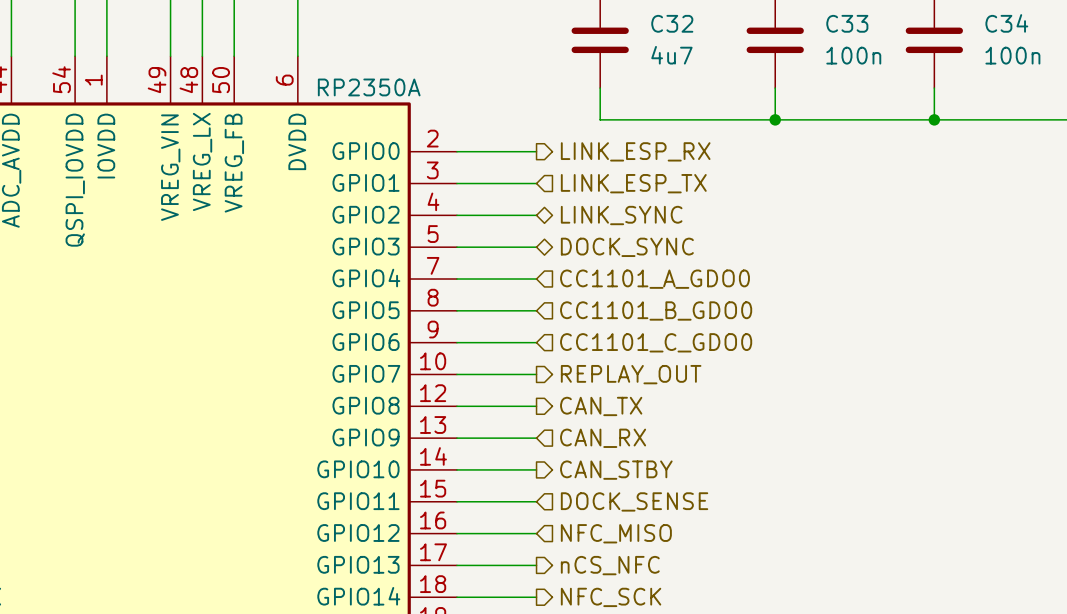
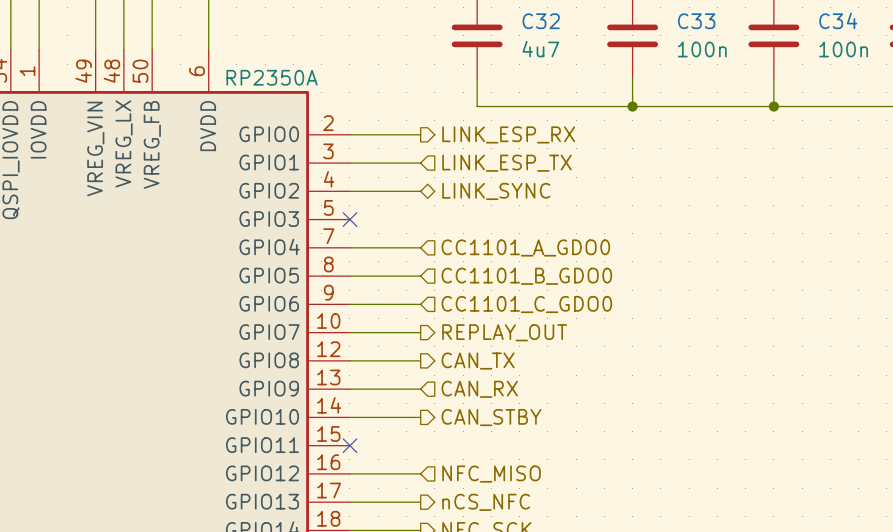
wire: (456, 247) (536, 247) -> none
no-connect mark: none -> (349, 219)
hierarchical label: DOCK_SYNC (627, 247) -> none
wire: (456, 501) (536, 501) -> none
no-connect mark: none -> (349, 445)
hierarchical label: DOCK_SENSE (634, 501) -> none

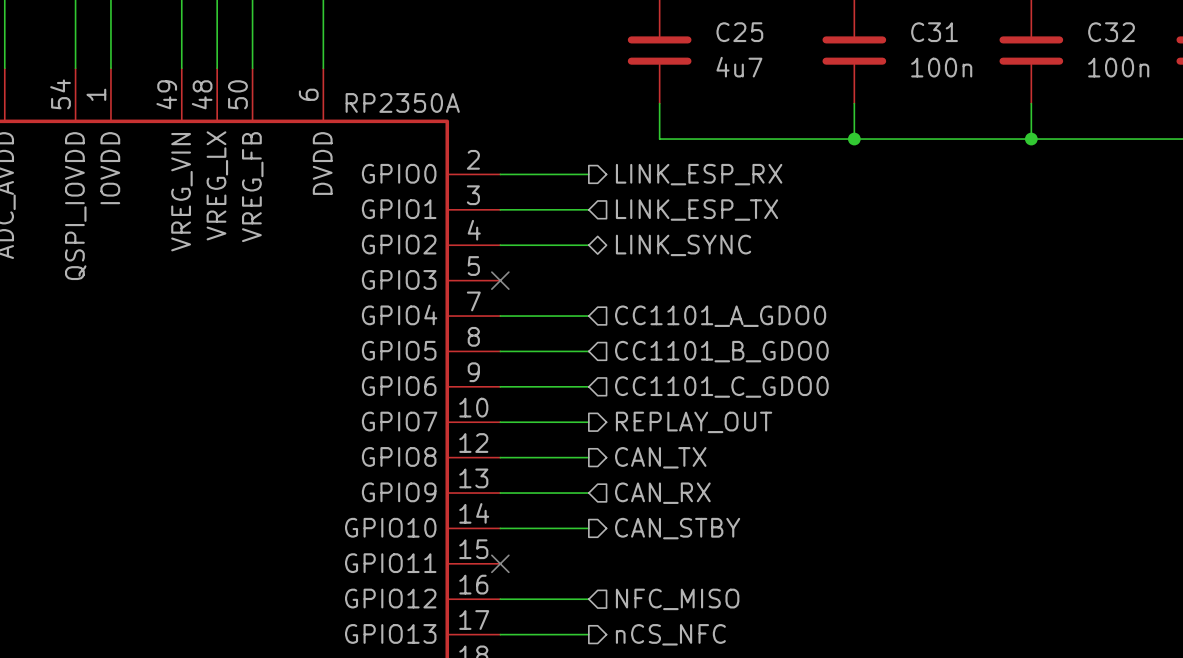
C34 name: C34 (838, 20) -> C32 (1111, 32)
C32 name: C32 (541, 21) -> C25 (739, 32)
C33 name: C33 (696, 21) -> C31 (934, 32)

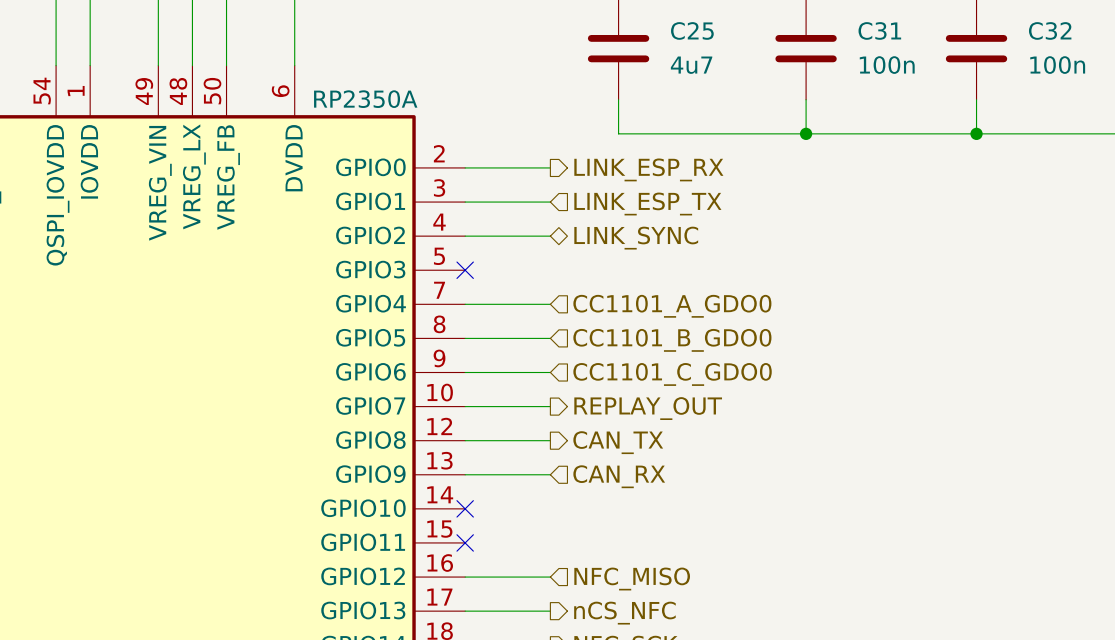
wire: (500, 528) (588, 528) -> none
no-connect mark: none -> (465, 508)
hierarchical label: CAN_STBY (677, 528) -> none

